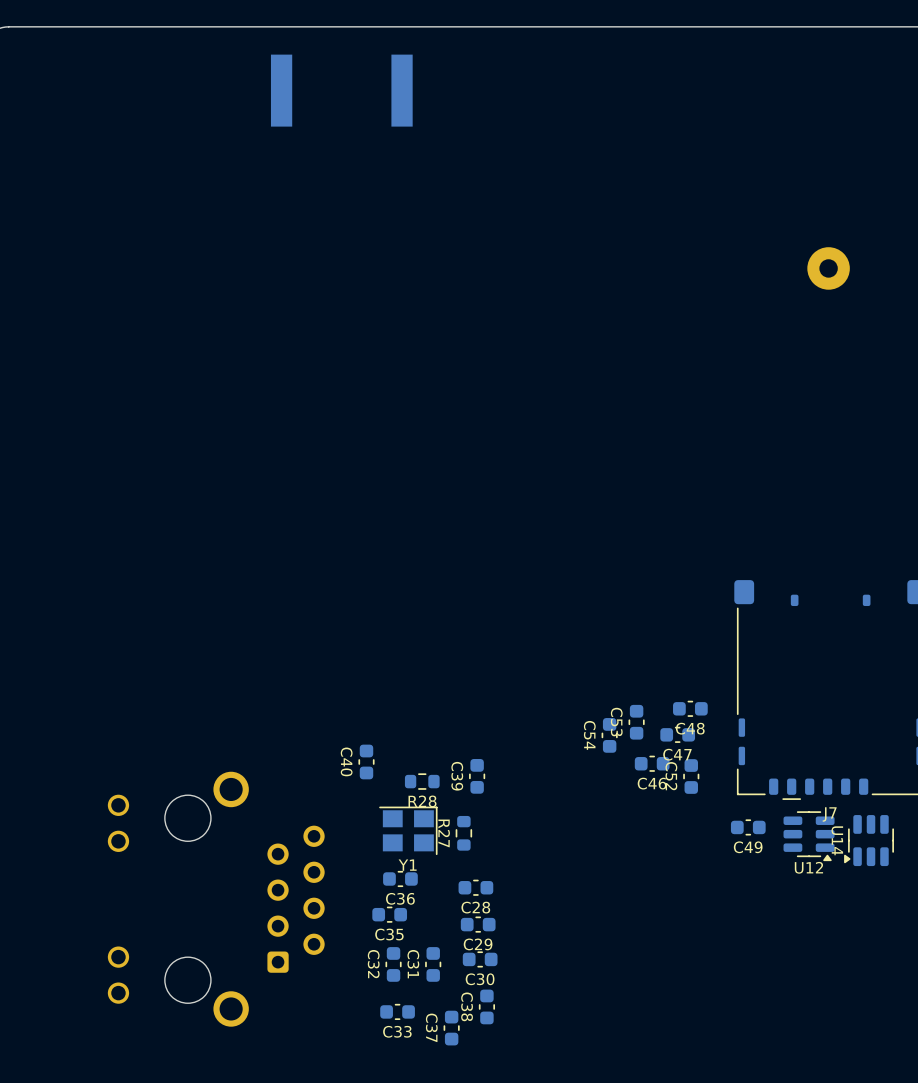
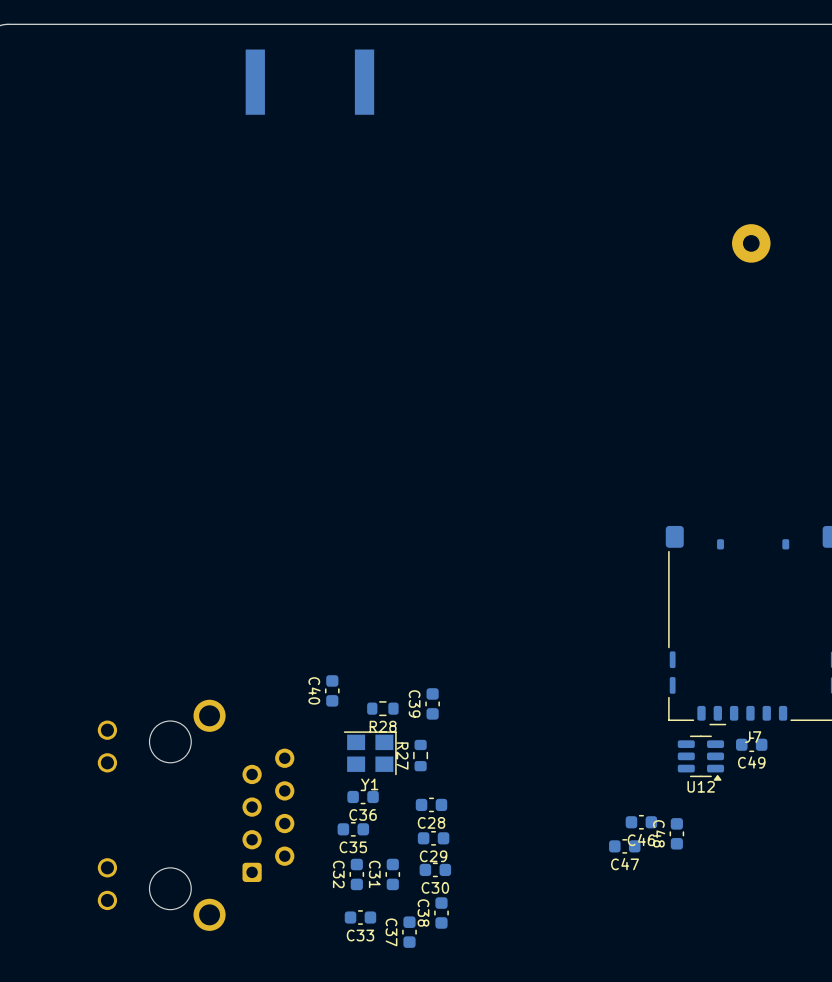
C48 rotation: 0° (690, 708) -> 90° clockwise (676, 833)
C48 position: (690, 708) -> (676, 833)
C53: (636, 722) -> none
C47 position: (677, 734) -> (624, 846)
C54: (609, 735) -> none
C46 position: (652, 763) -> (641, 822)
C52: (691, 776) -> none
C49 position: (748, 827) -> (751, 744)
U12 position: (809, 836) -> (700, 758)
U14: (869, 840) -> none

